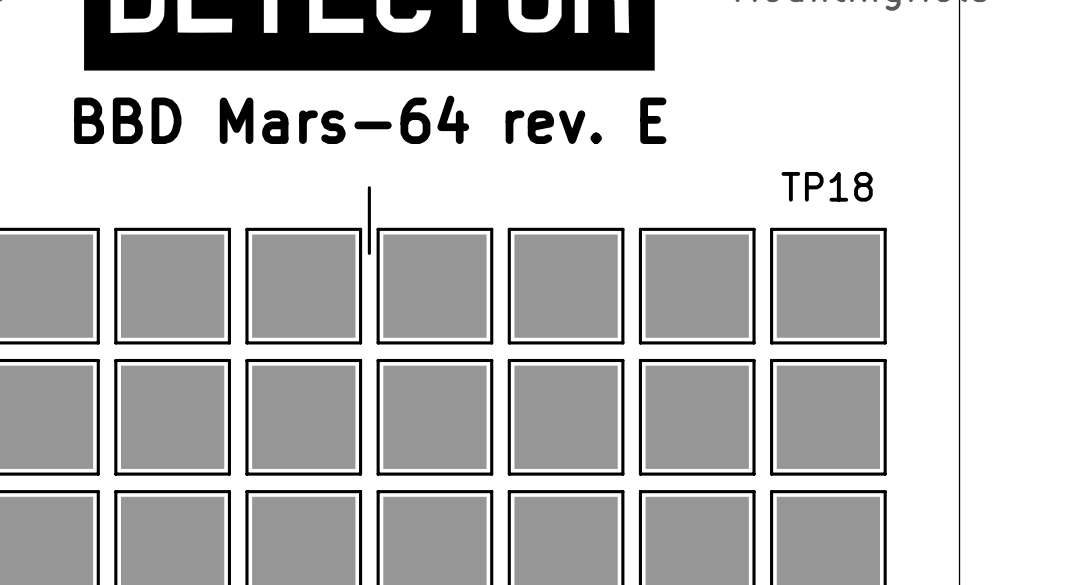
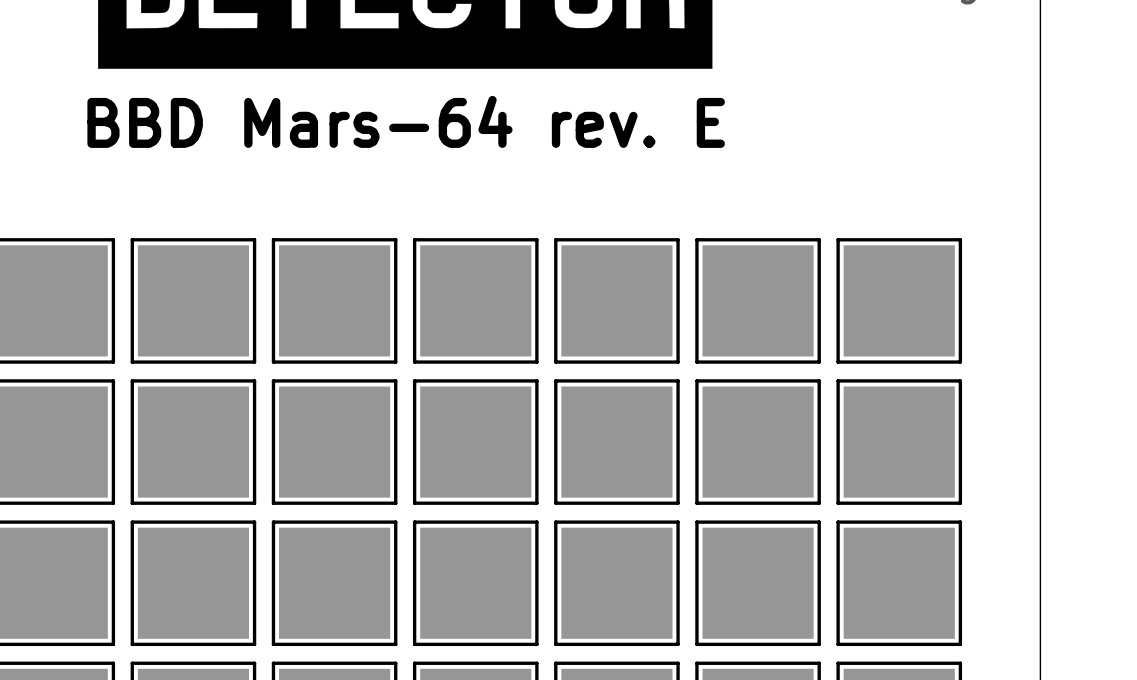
text: TP18 (827, 186) -> none
line: (369, 187) (369, 253) -> none

